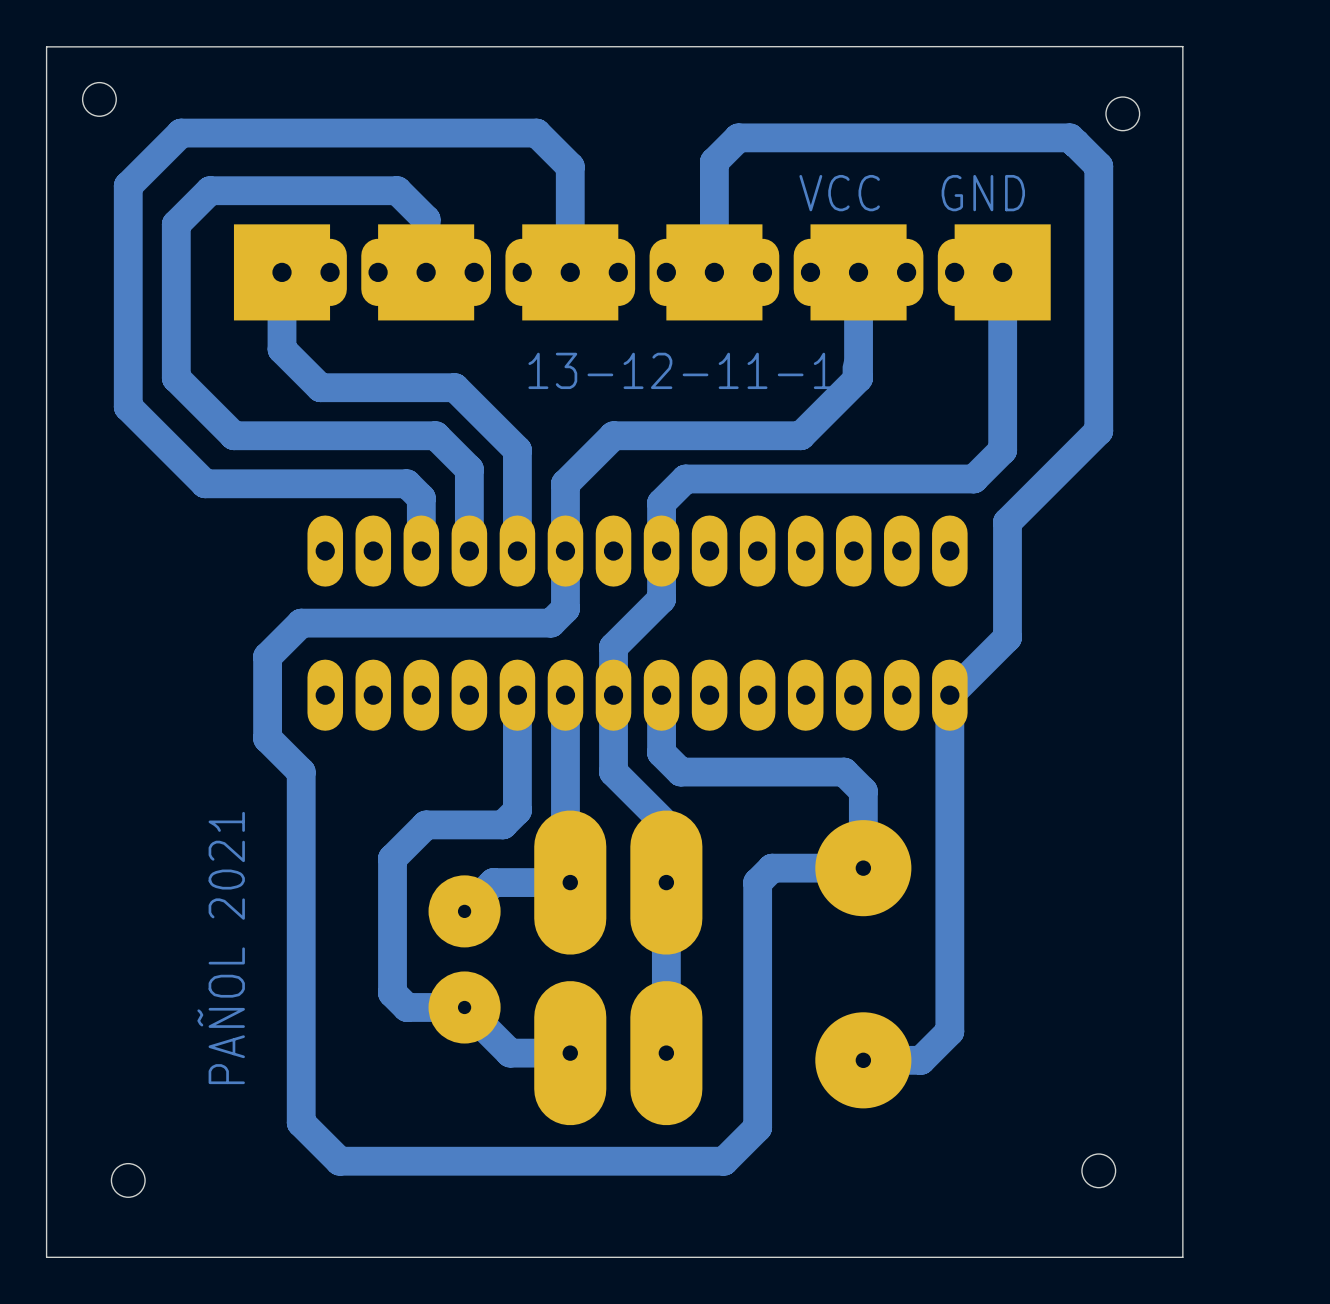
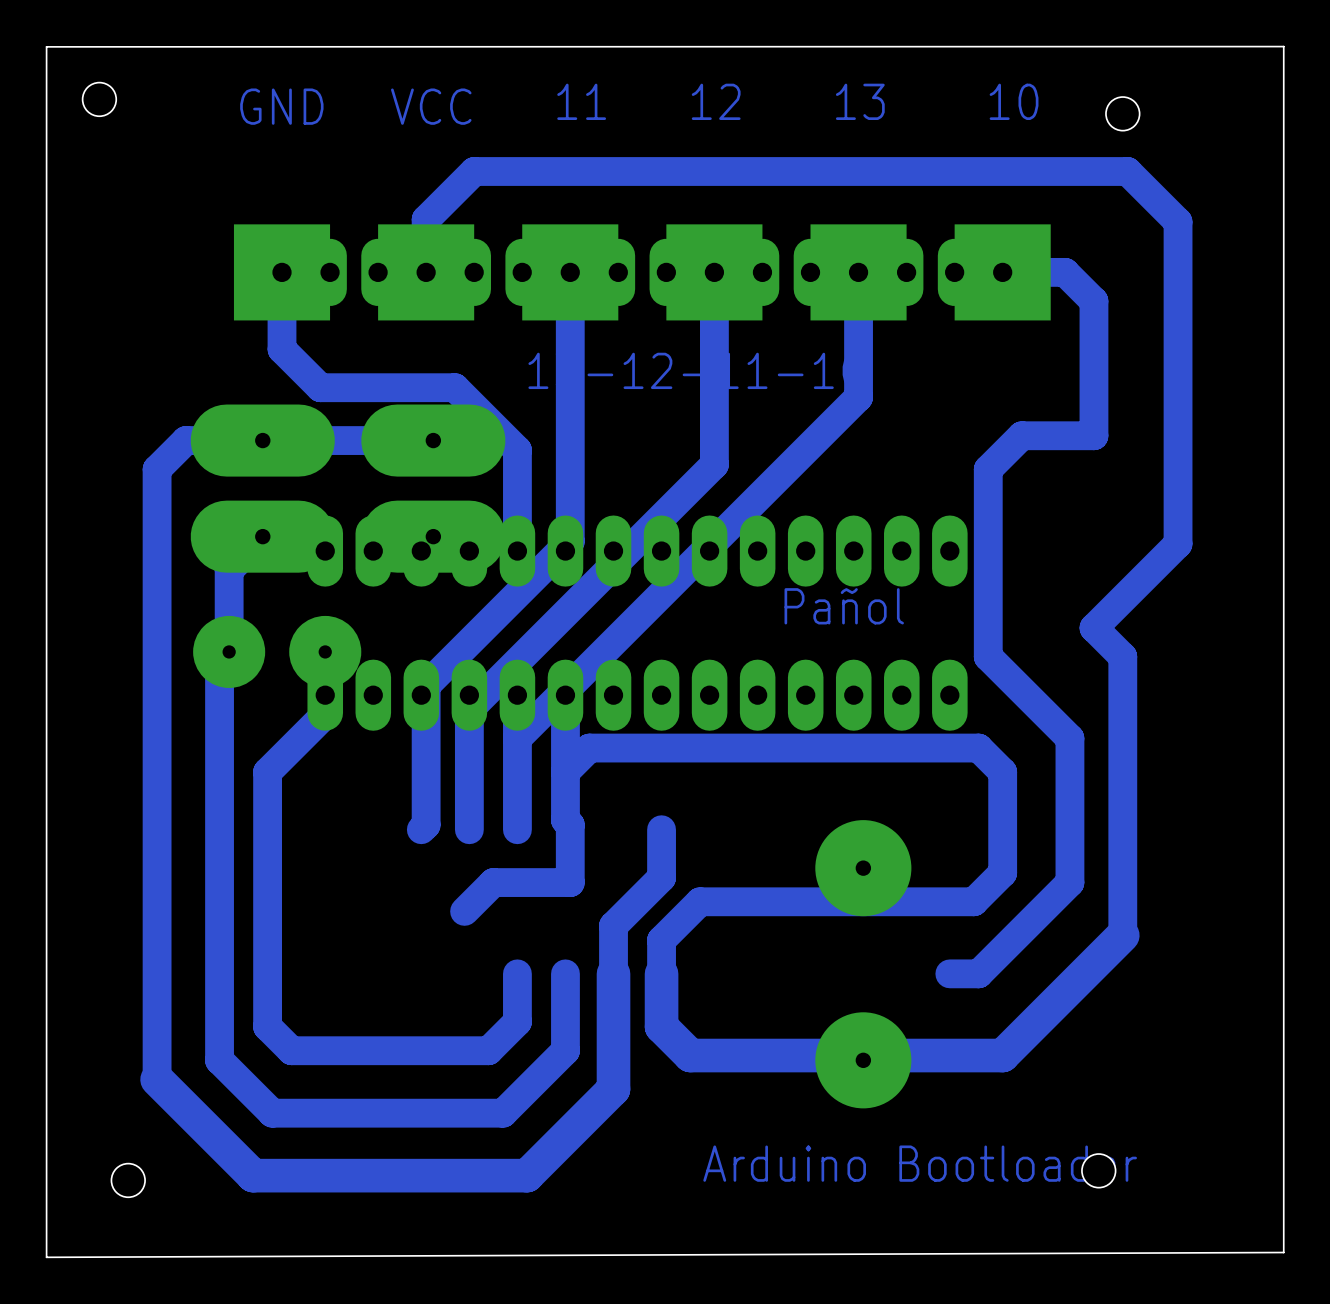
board edge: (1182, 46) (1182, 1257) (46, 1257) -> (1182, 46) (1283, 46) (1283, 1252) (46, 1257)
text: none -> 11 (581, 101)
text: none -> 12 (716, 101)
text: none -> 13 (860, 101)
text: none -> 10 (1014, 101)
text: none -> GND (281, 106)
bottom track: (1075, 143) (1069, 137) (738, 137) (714, 161) (714, 272) -> (469, 829) (469, 709) (714, 464) (714, 272)
bottom track: (1075, 143) (1098, 166) (1098, 430) (1007, 522) (1007, 637) (949, 695) (949, 1031) (921, 1060) (863, 1060) -> none
text position: VCC (839, 193) -> VCC (431, 106)
text: GND (983, 193) -> none
bottom track: (426, 219) (397, 190) (209, 190) (176, 224) (176, 378) (233, 435) (435, 435) (469, 469) (469, 551) -> (426, 219) (474, 171) (1127, 171) (1178, 221) (1178, 543) (1093, 627) (1122, 656) (1122, 935) (1002, 1055) (690, 1055) (661, 1026) (661, 940) (699, 901) (973, 901) (1002, 872) (1002, 772) (978, 748) (589, 748) (565, 772)
bottom track: (570, 272) (570, 166) (536, 133) (181, 133) (128, 185) (128, 406) (205, 483) (406, 483) (421, 498) (421, 551) -> (570, 272) (570, 541) (426, 685) (426, 824)
bottom track: (1002, 272) (1002, 450) (973, 478) (685, 478) (661, 503) (661, 599) (613, 647) (613, 772) (666, 824) (666, 1053) -> (1002, 272) (1065, 272) (1093, 301) (1093, 435) (1021, 435) (988, 469) (988, 656) (1069, 738) (1069, 882) (978, 973) (949, 973)
bottom track: (858, 378) (800, 435) (613, 435) (565, 483) (565, 608) (551, 623) (301, 623) (267, 656) (267, 738) (301, 772) (301, 1122) (339, 1161) (724, 1161) (757, 1127) (757, 882) (772, 868) (863, 868) (863, 791) (844, 772) (680, 772) (661, 752) (661, 695) -> (858, 378) (858, 397) (517, 738)
bottom track: none -> (433, 440) (185, 440) (157, 469) (157, 1079) (253, 1175) (527, 1175) (613, 1089) (613, 925) (661, 877) (661, 829)
part: none -> (262, 488)
part: none -> (433, 488)
bottom track: none -> (262, 536) (229, 570) (229, 651) (219, 661) (219, 1060) (272, 1113) (503, 1113) (565, 1050) (565, 973)
text: none -> Pañol (844, 606)
bottom track: none -> (320, 647) (325, 651) (325, 714) (267, 772) (267, 1026) (291, 1050) (488, 1050) (517, 1021) (517, 973)
bottom track: (517, 810) (503, 824) (426, 824) -> (517, 810) (517, 829)
bottom track: (421, 829) (392, 858) (392, 993) (406, 1007) (464, 1007) (510, 1053) (570, 1053) -> none
part: (618, 882) -> none
text: PAÑOL 2021 (221, 948) -> none
part rotation: 0° (464, 959) -> 90° clockwise (277, 651)
part position: (464, 959) -> (277, 651)
part: (618, 1053) -> none
text: none -> Arduino Bootloader (920, 1163)

